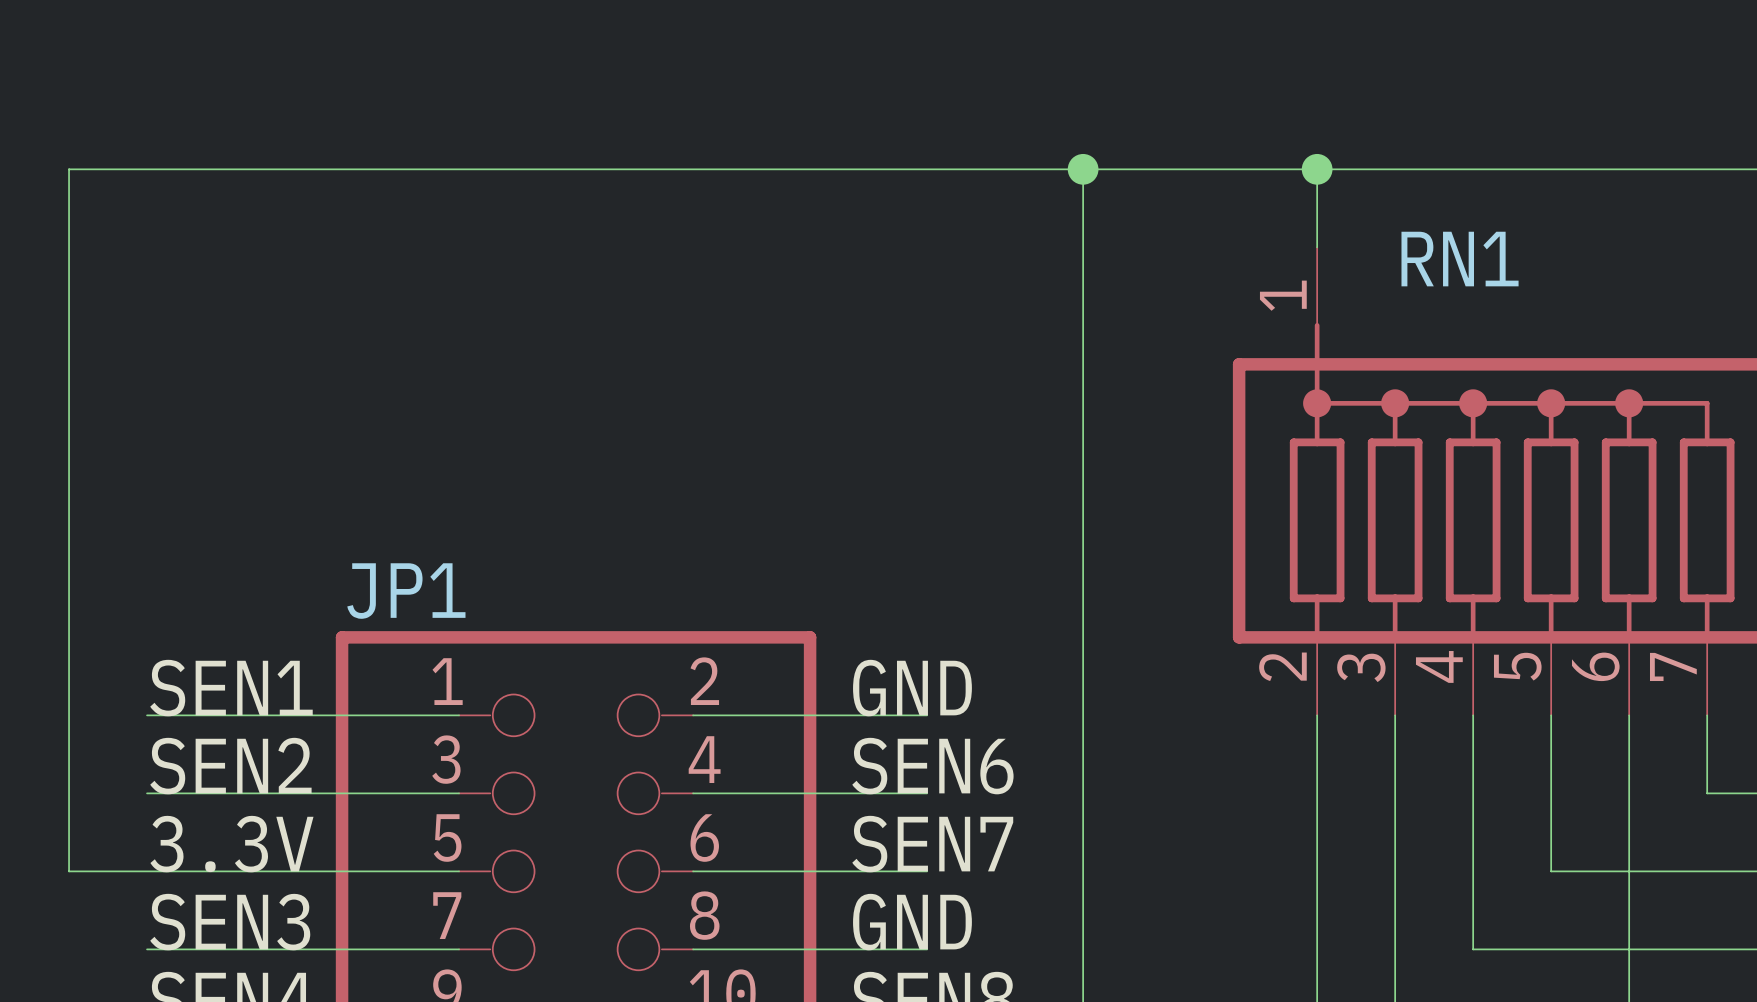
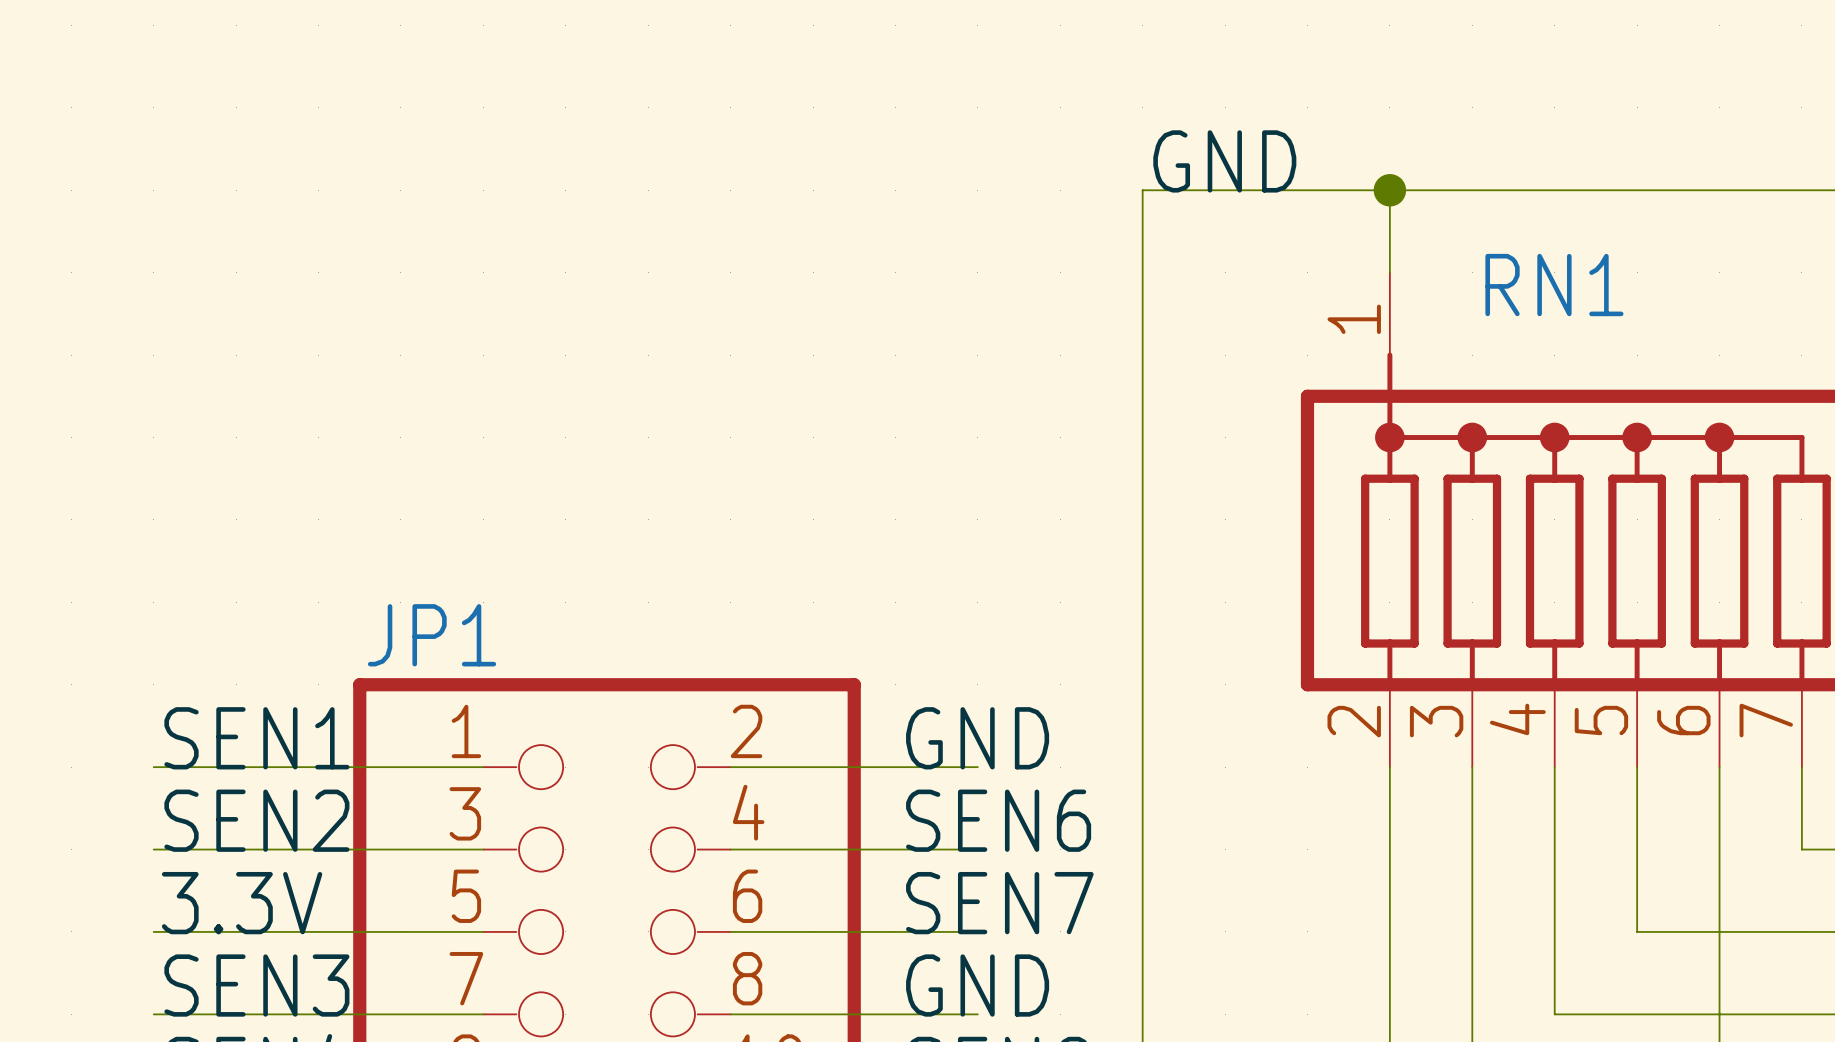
label: none -> GND (1224, 161)
wire: (1083, 169) (69, 169) (69, 871) (147, 871) -> none
junction: (1083, 169) -> none

